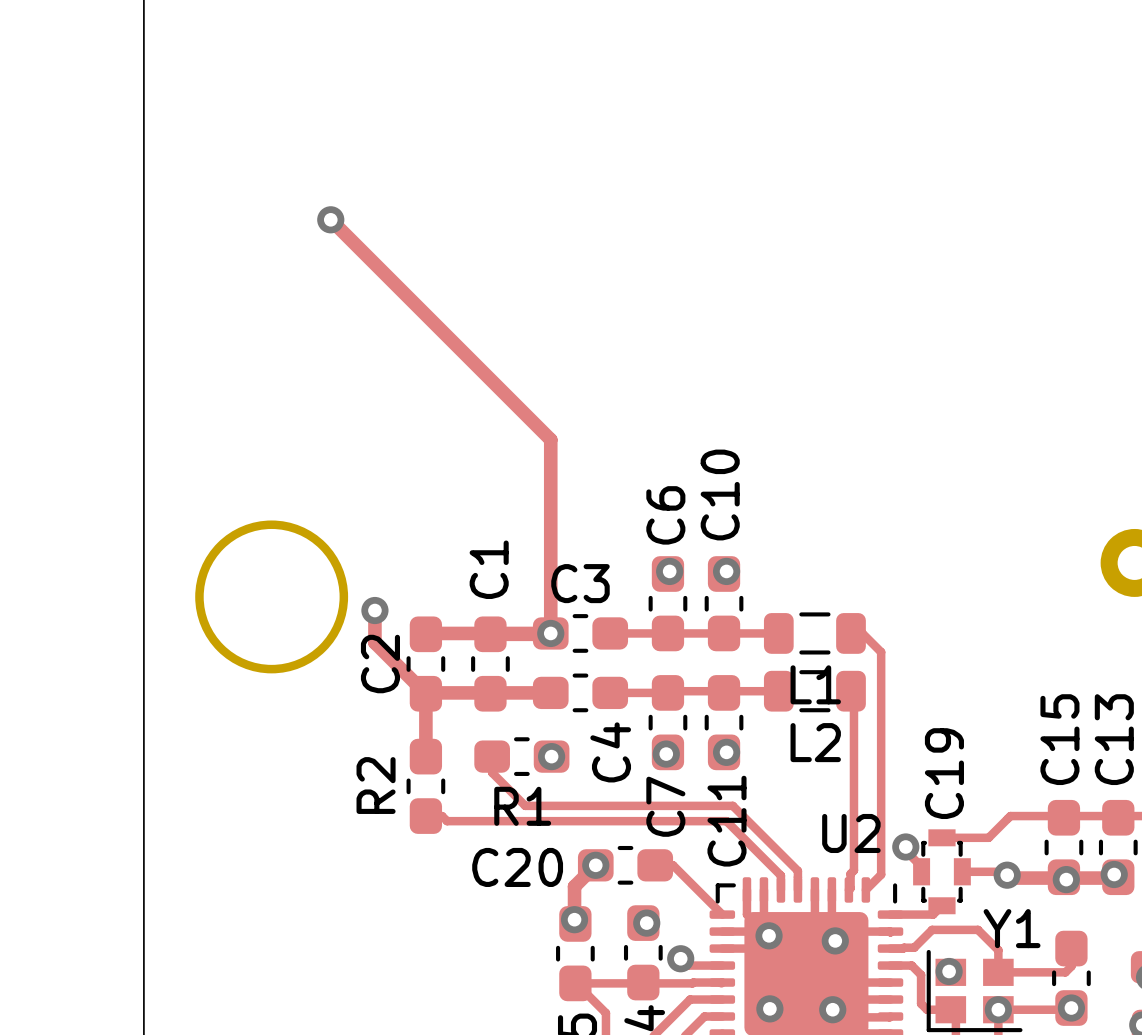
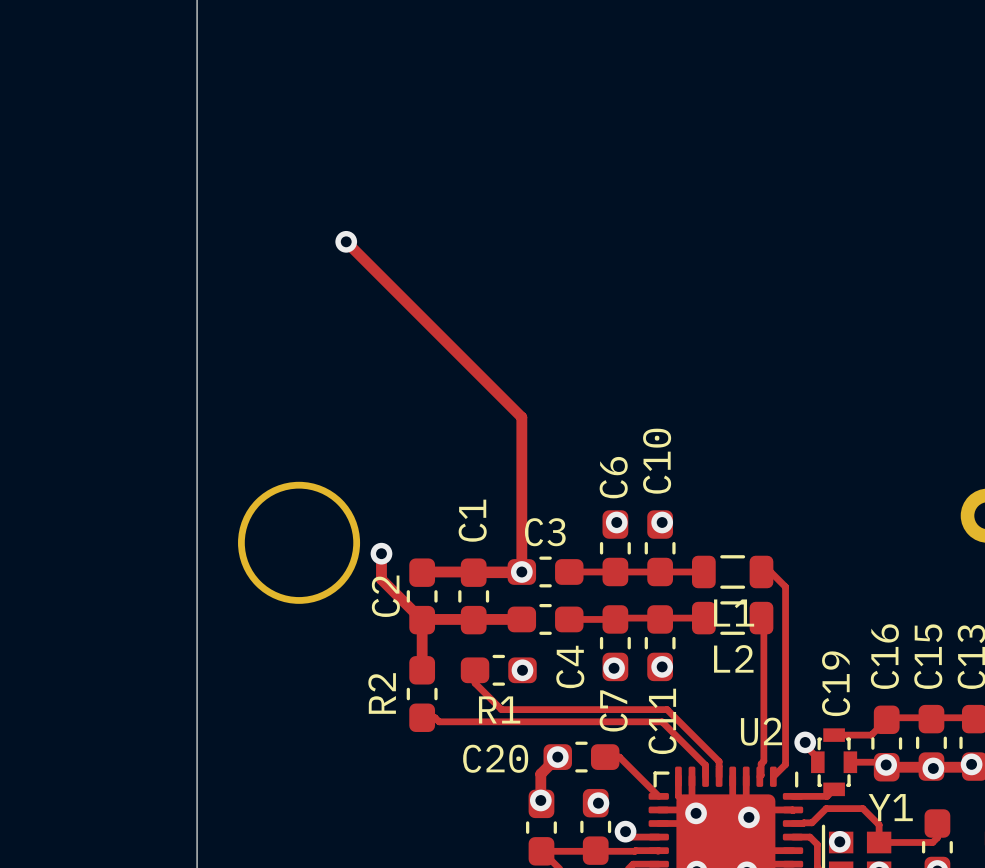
C16: none -> (886, 743)

